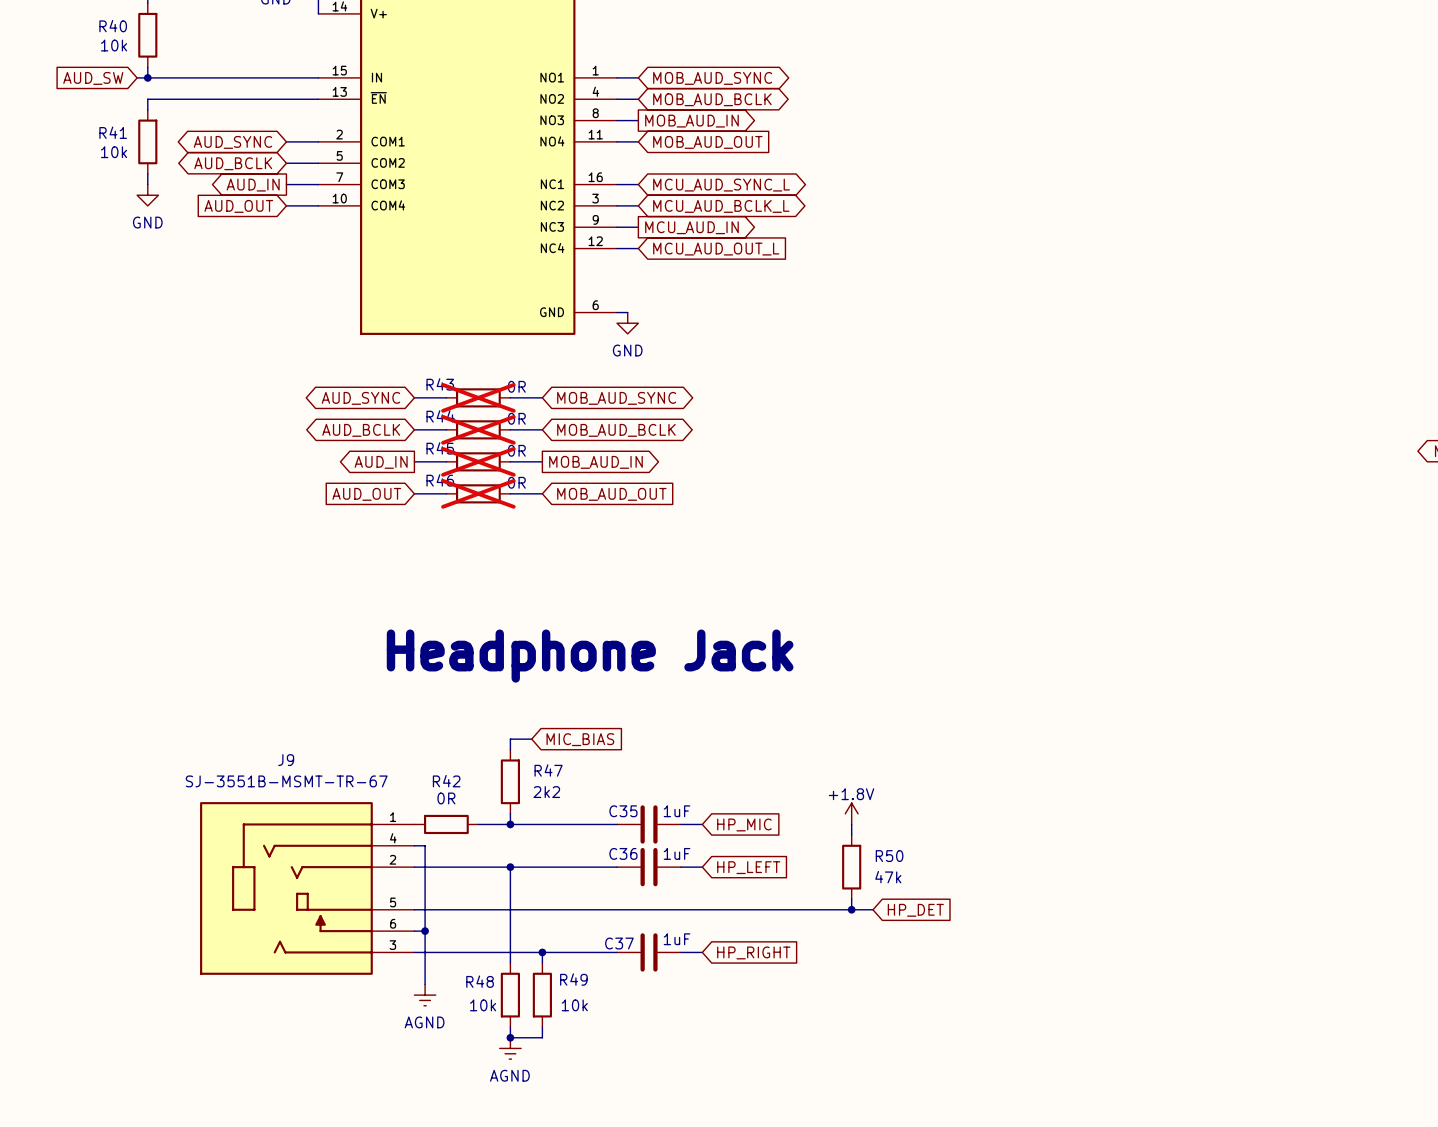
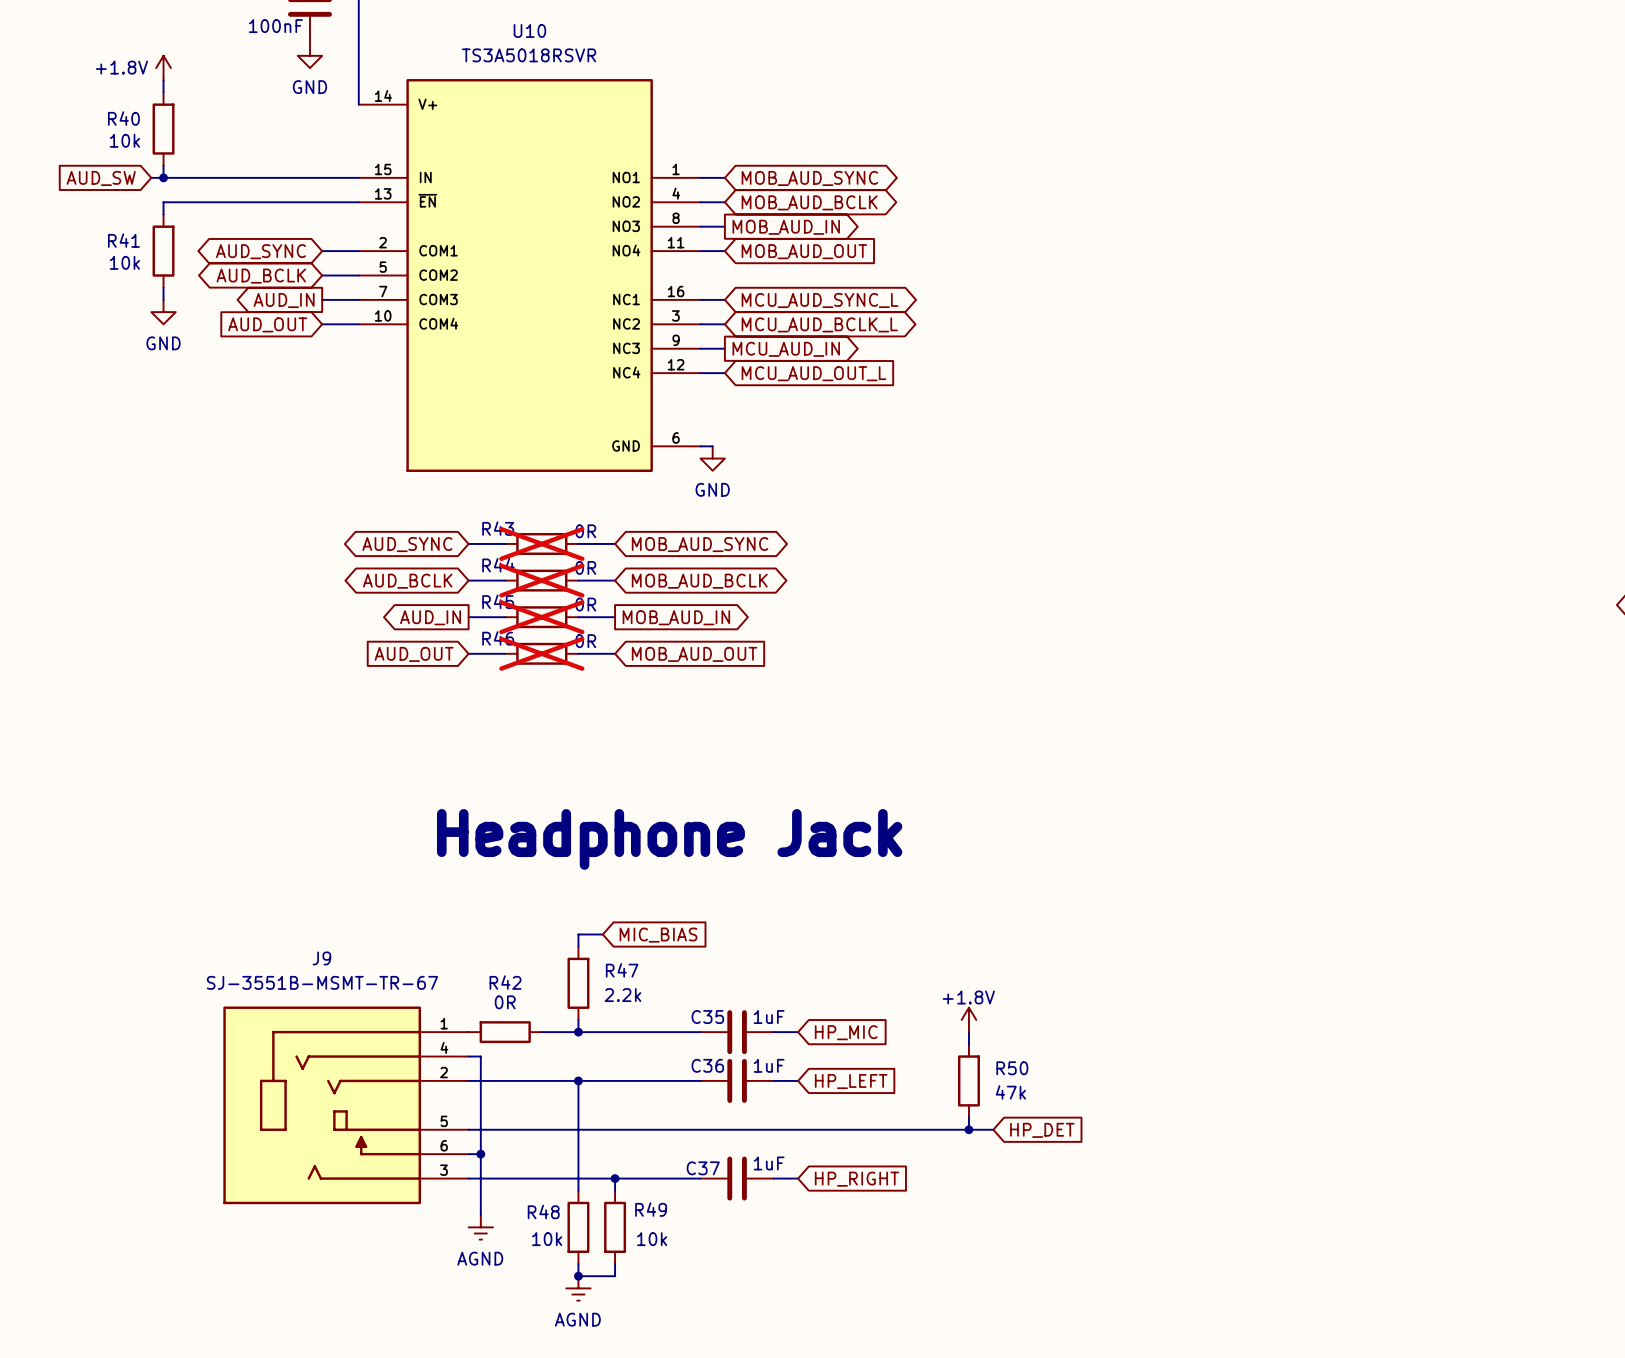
R47 value: 2k2 (546, 792) -> 2.2k (623, 995)

